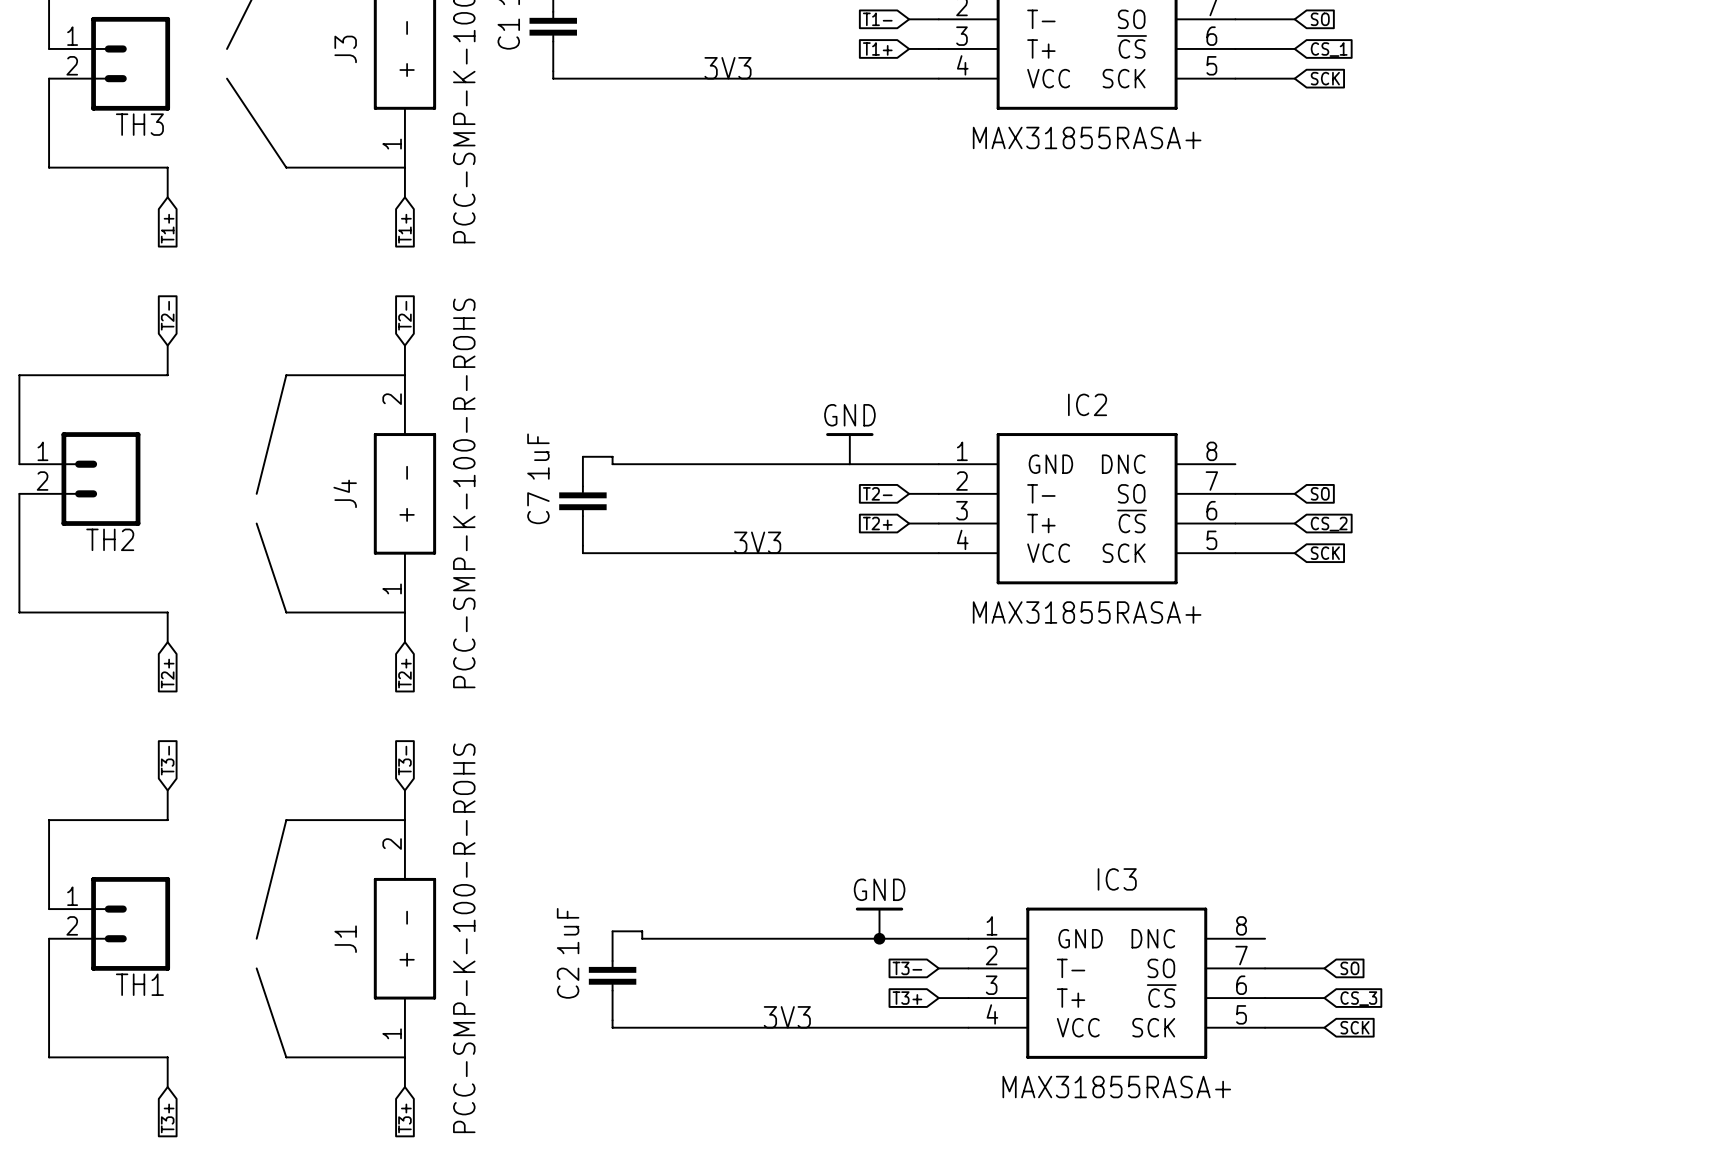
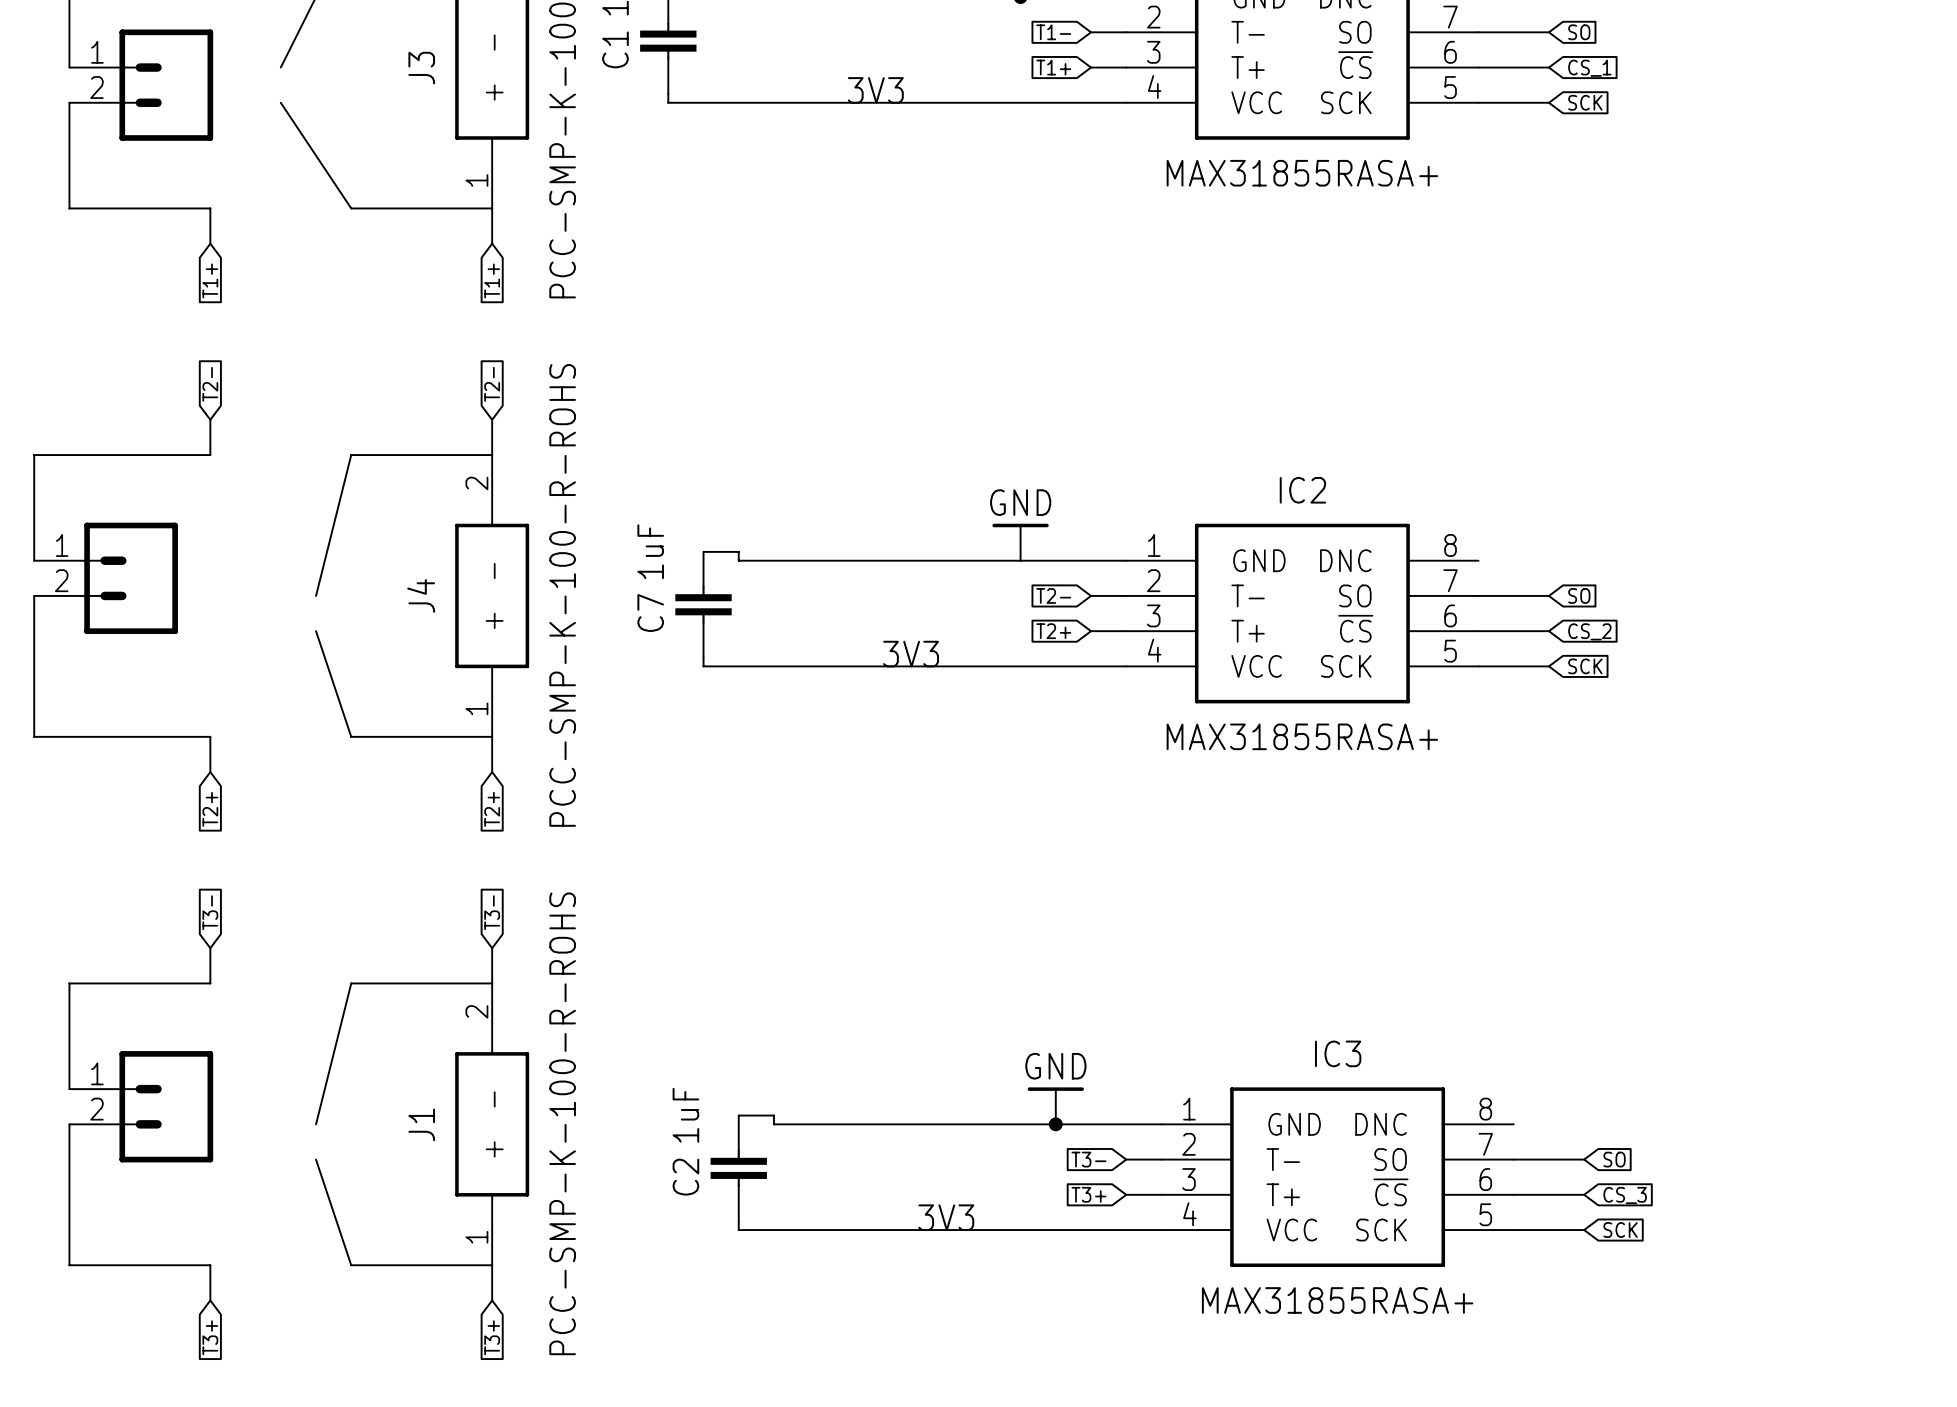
TH3 name: TH3 (139, 124) -> none
TH2 name: TH2 (110, 539) -> none
TH1 name: TH1 (139, 984) -> none

